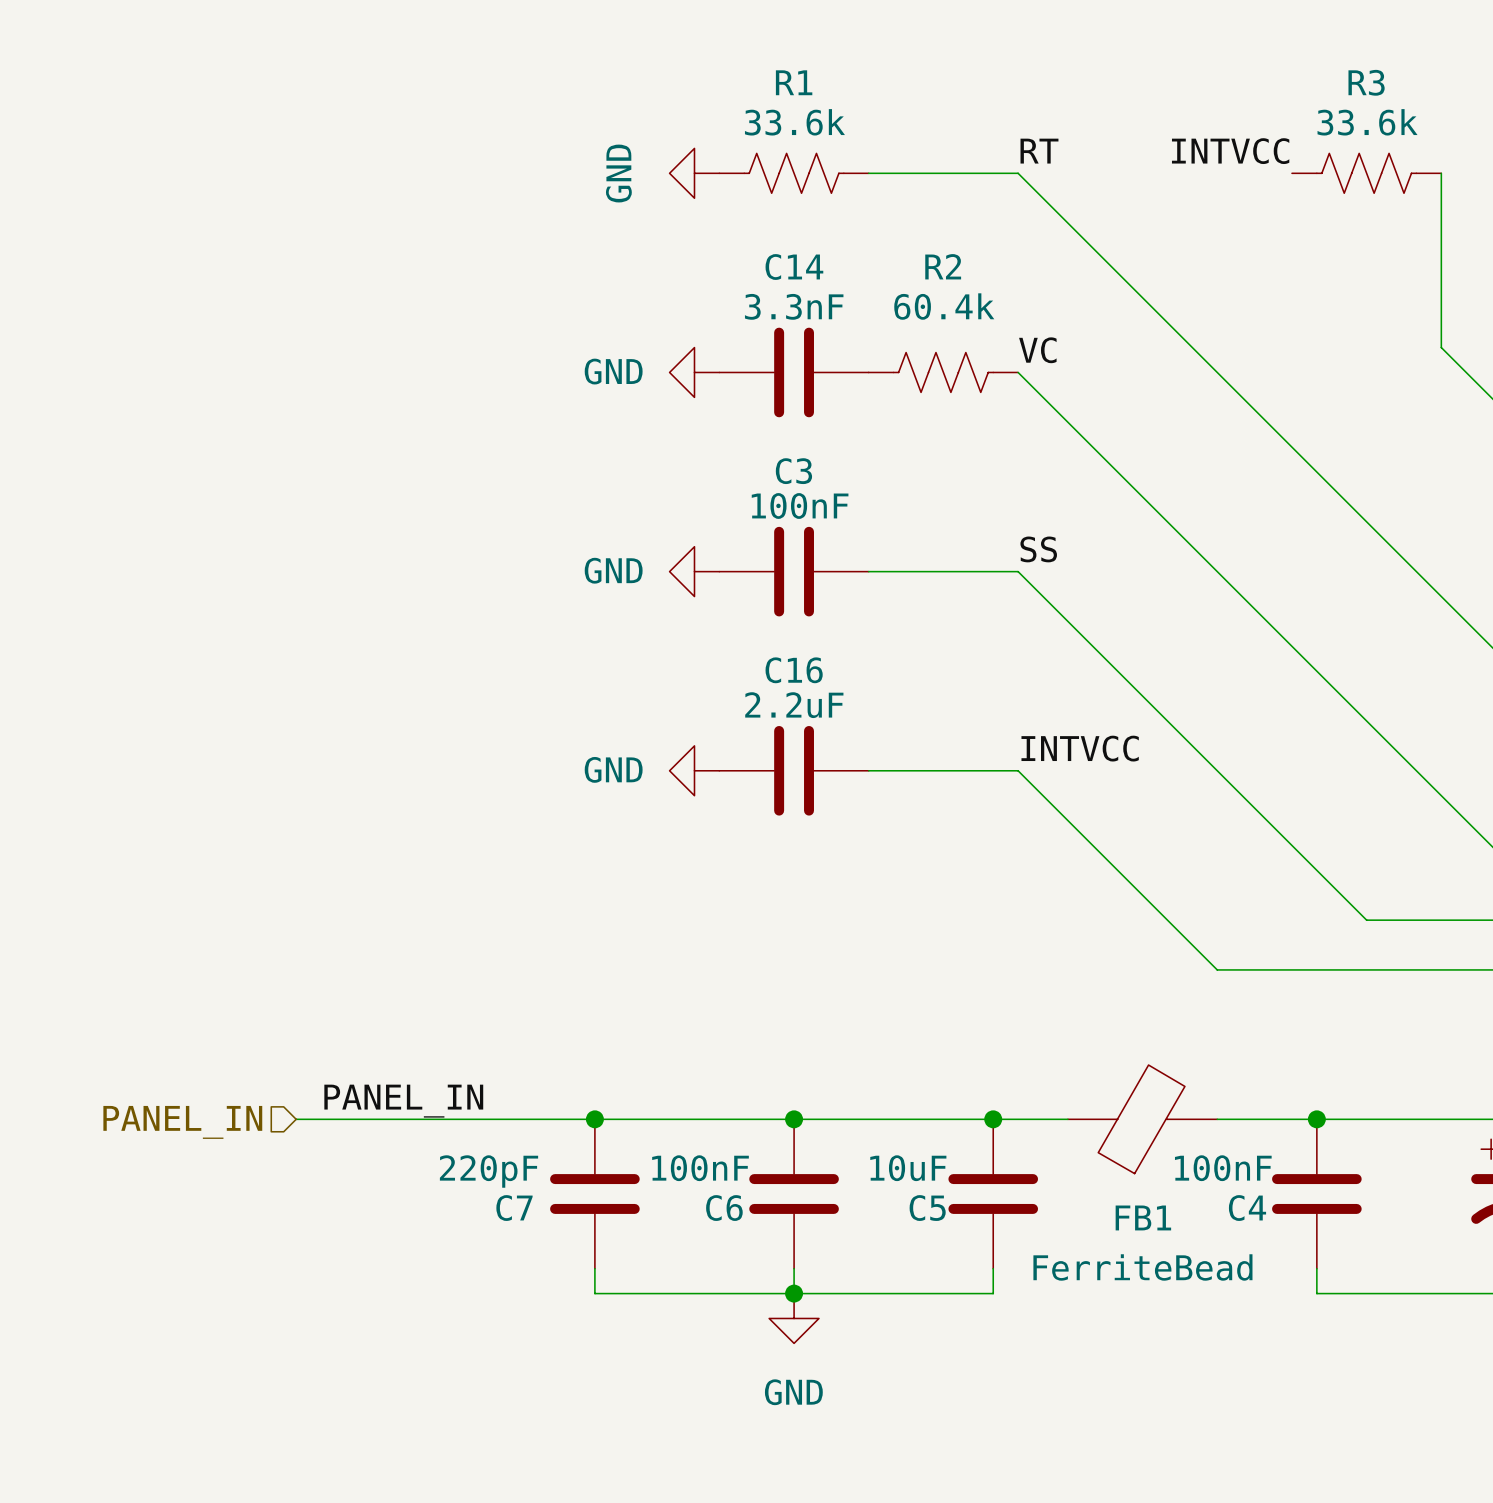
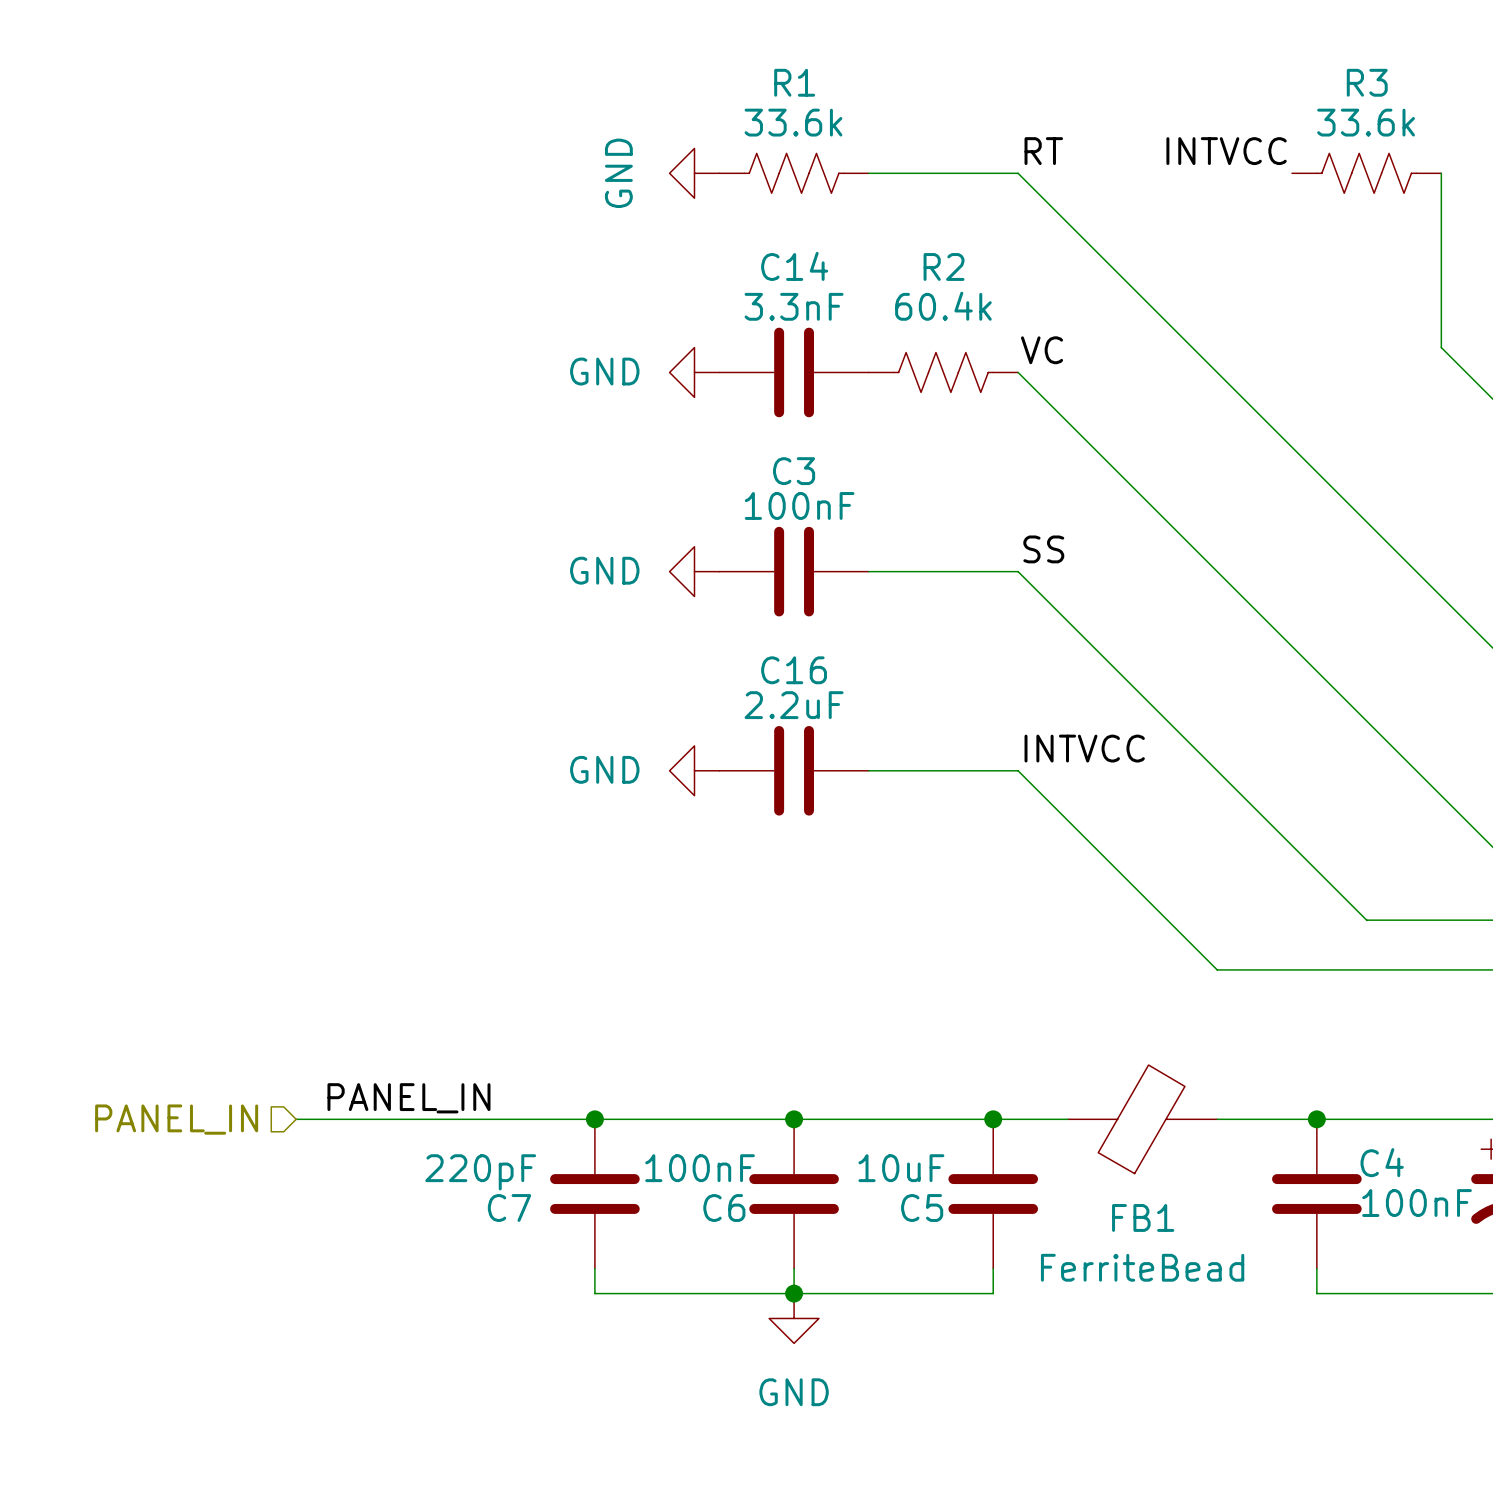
C4 value position: 100nF (1223, 1168) -> 100nF (1417, 1203)
C4 name position: C4 (1247, 1208) -> C4 (1382, 1162)

